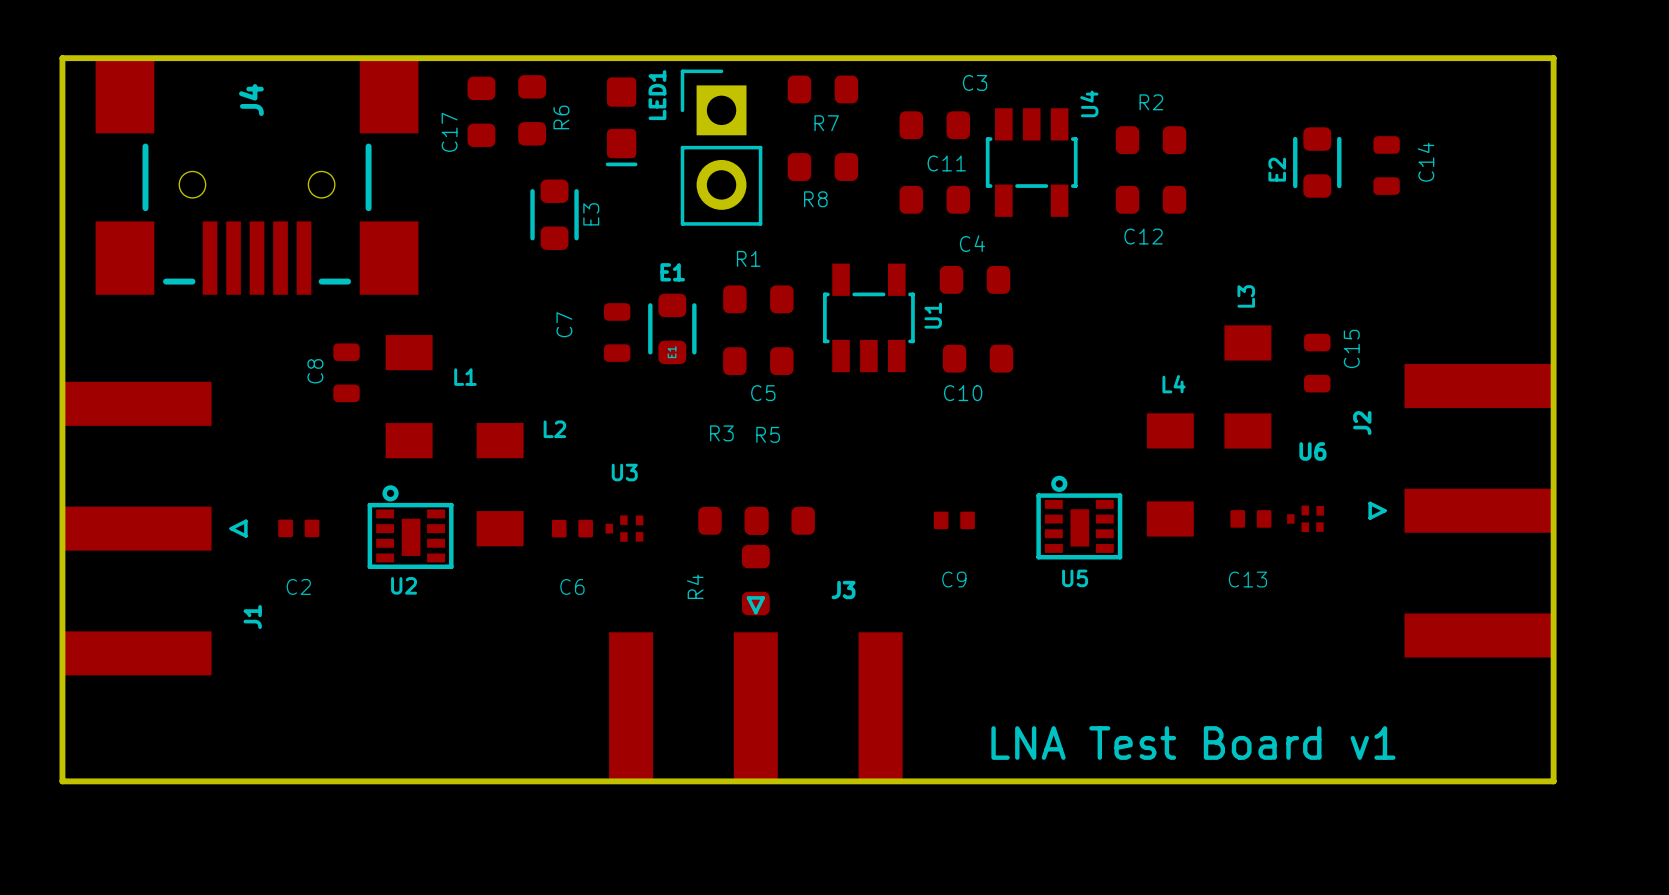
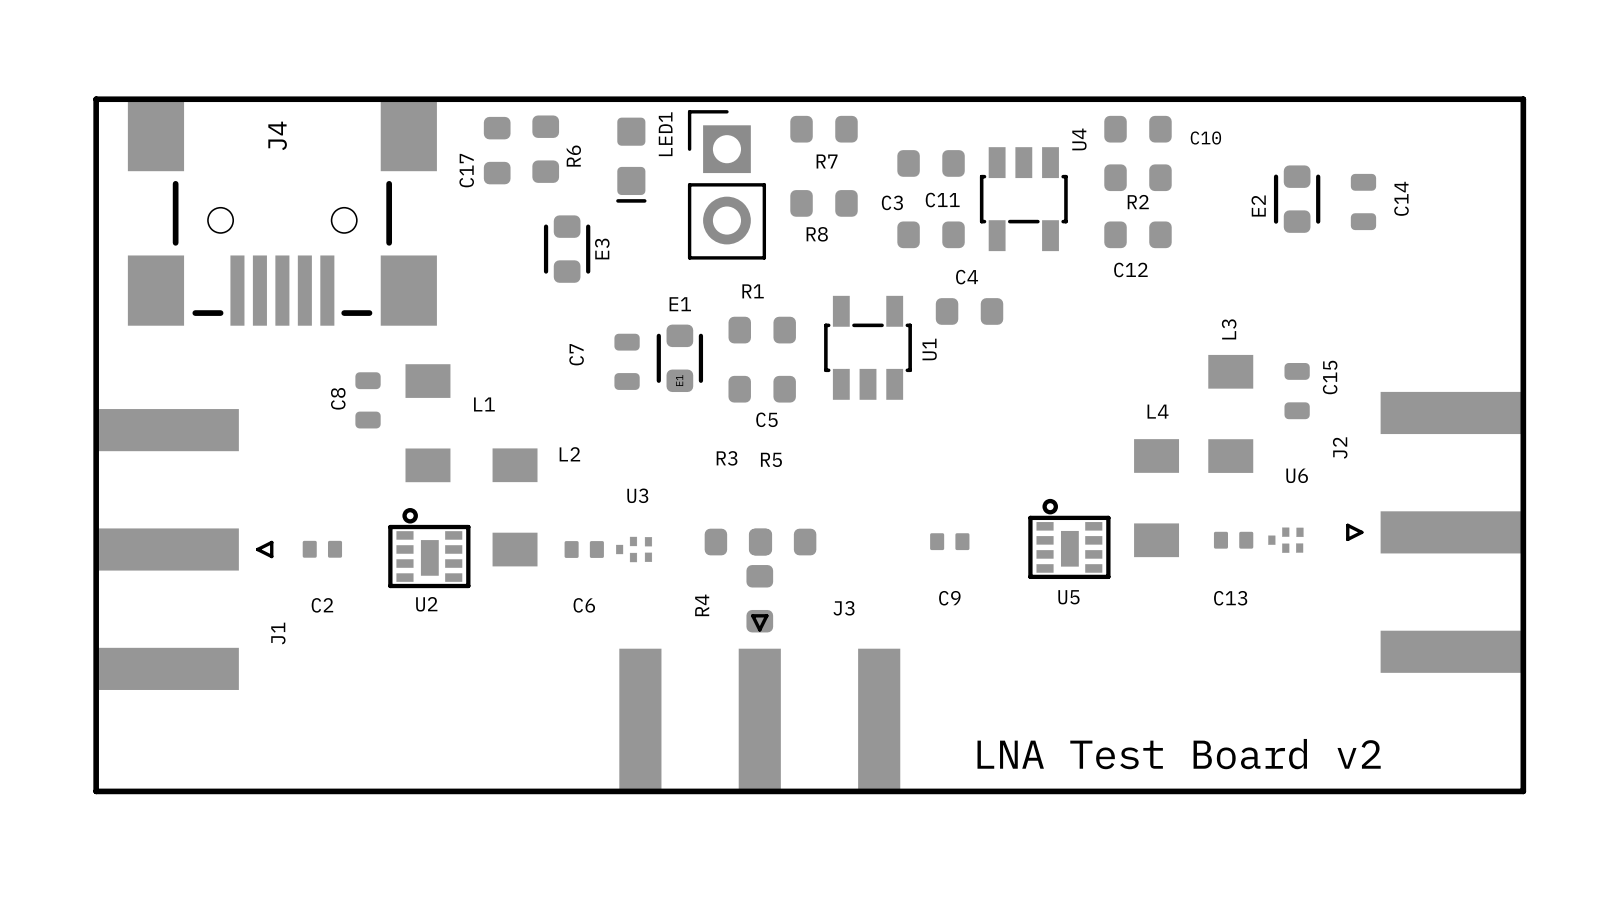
C3 name position: C3 (975, 82) -> C3 (892, 202)
R2 name position: R2 (1151, 102) -> R2 (1138, 202)
C10 position: (978, 358) -> (1137, 129)
C10 name position: C10 (963, 393) -> C10 (1205, 138)
text: LNA Test Board v1 (1193, 743) -> LNA Test Board v2 (1179, 754)

